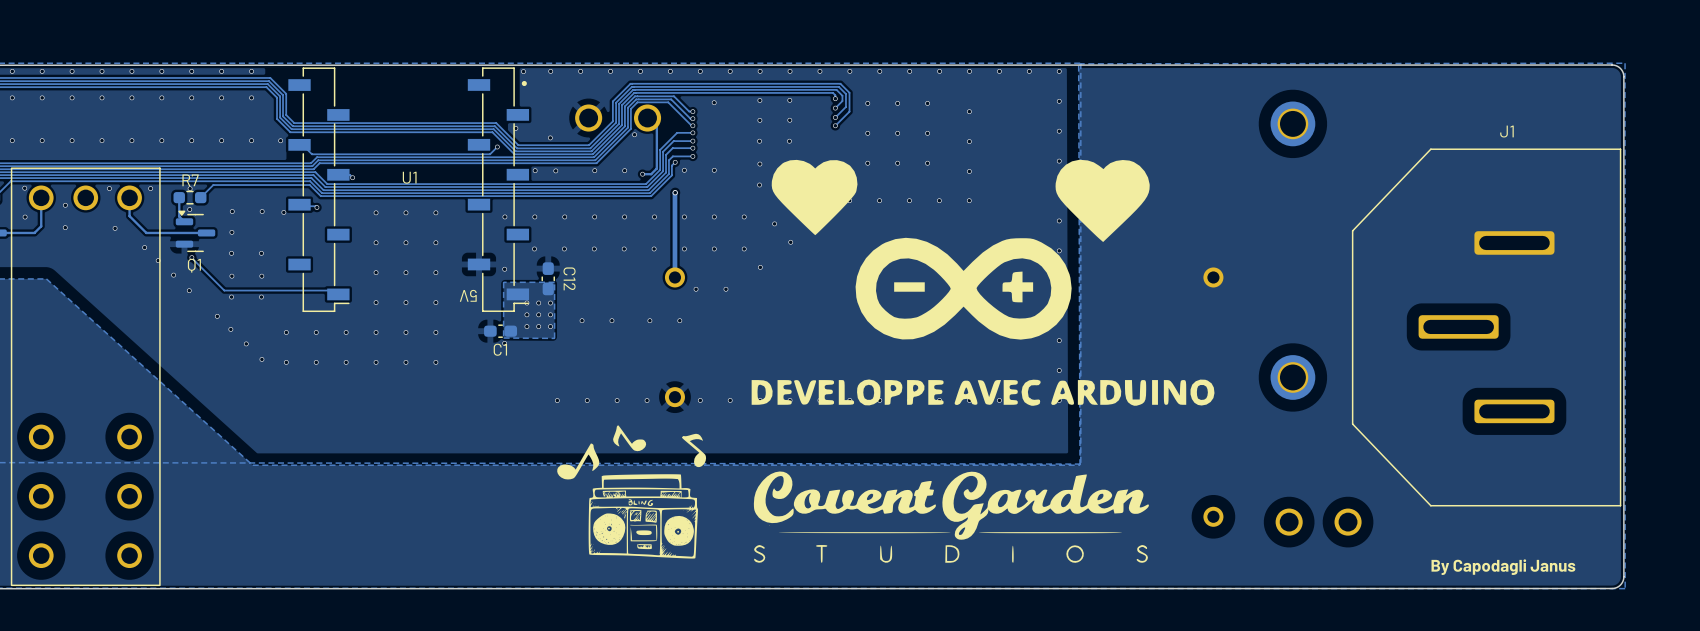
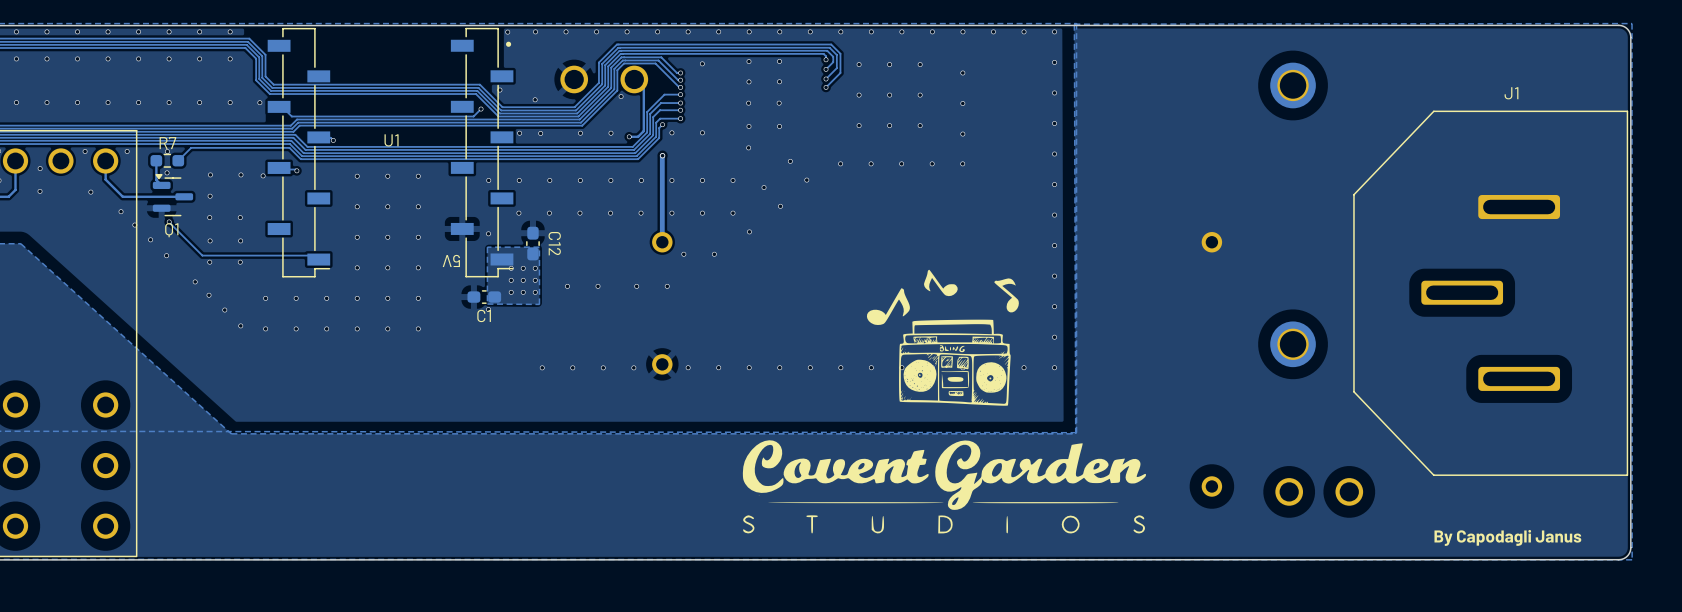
drawing: [751, 159, 1215, 406] -> none
drawing: none -> [866, 269, 1019, 406]
drawing: [557, 425, 707, 559] -> none

